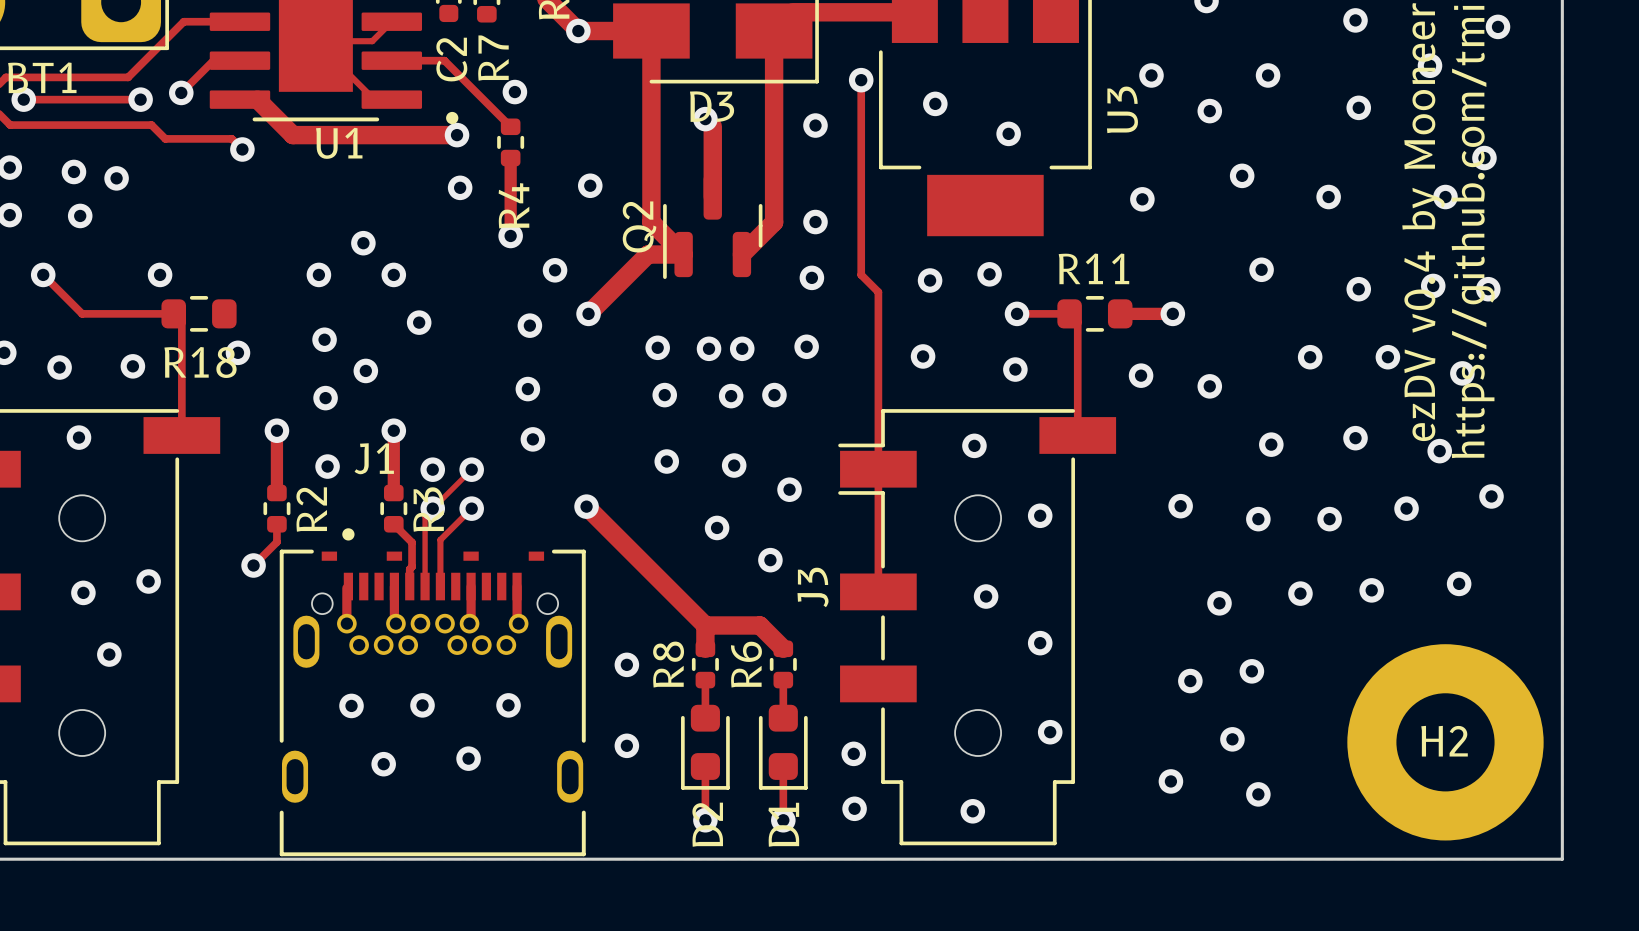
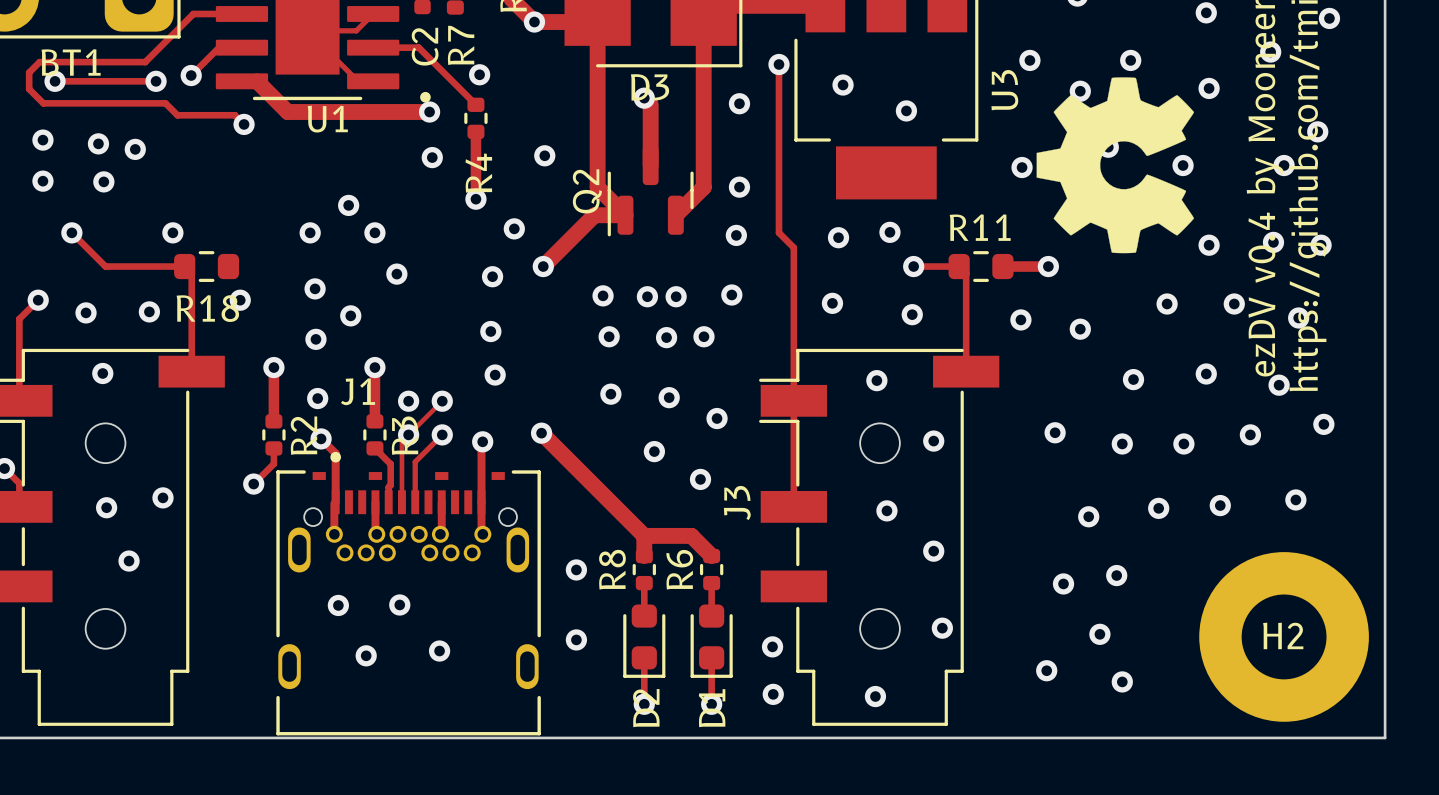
drawing: none -> [1036, 77, 1195, 254]
track: none -> (321, 438) (335, 453) (335, 502)
via: none -> (321, 438)
track: none -> (482, 441) (481, 502)
via: none -> (482, 441)
via: (508, 705) -> none

